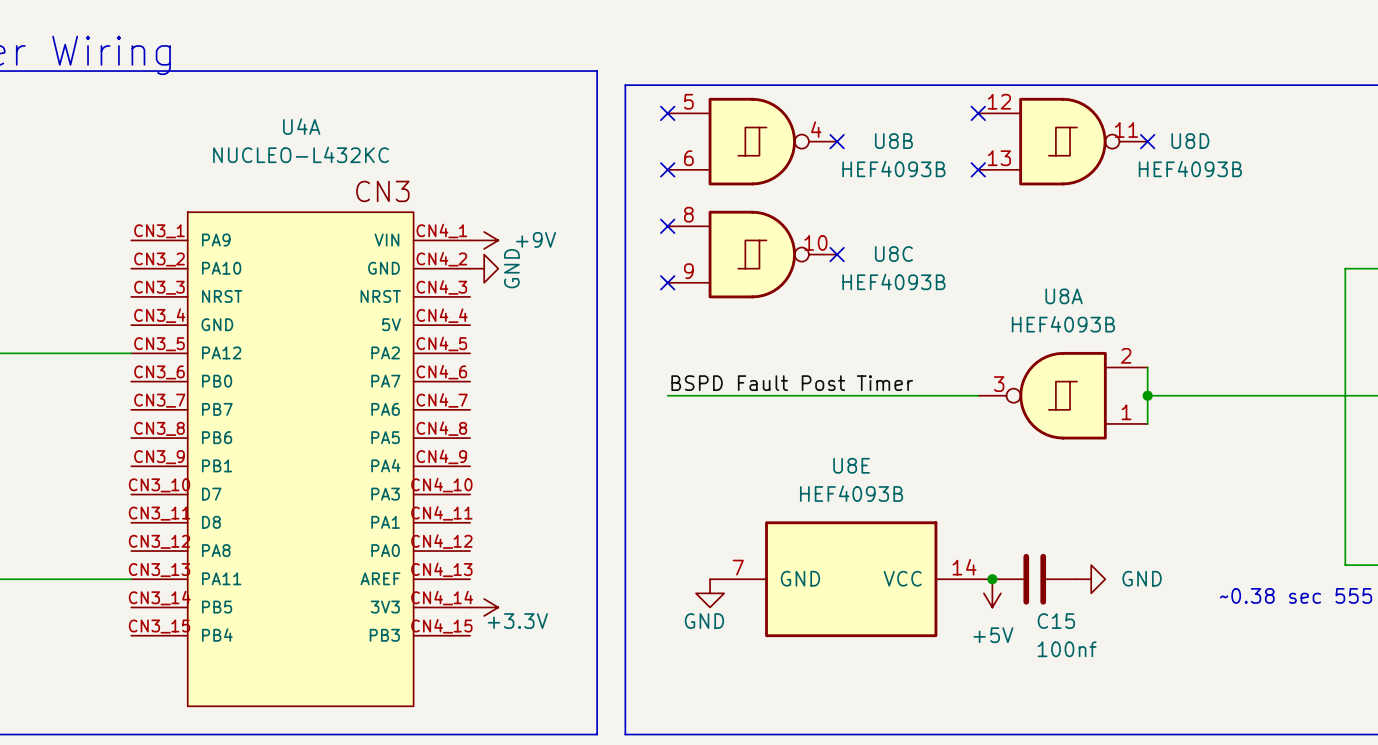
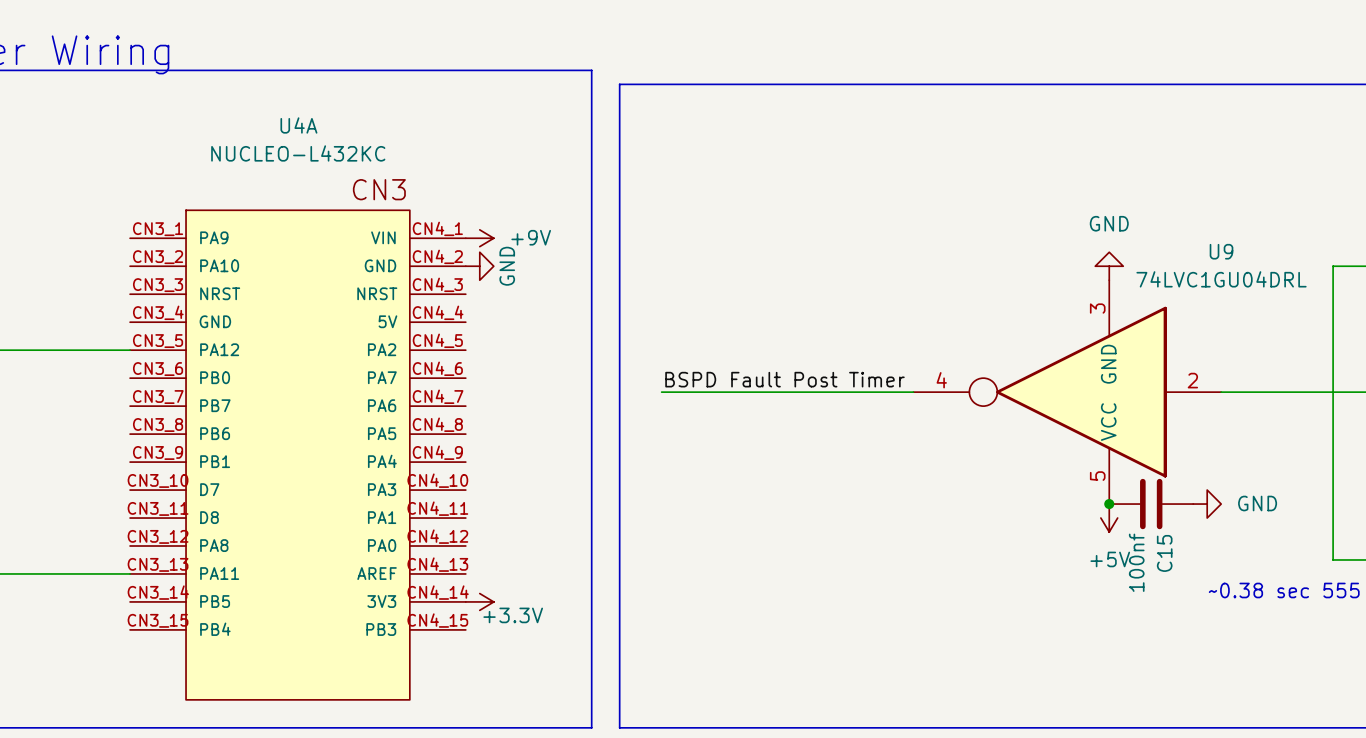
no-connect mark: (667, 113) -> none
no-connect mark: (978, 113) -> none
U8B: HEF4093B (752, 141) -> none
no-connect mark: (837, 141) -> none
U8D: HEF4093B (1062, 141) -> none
no-connect mark: (1147, 141) -> none
no-connect mark: (667, 169) -> none
no-connect mark: (978, 169) -> none
no-connect mark: (667, 226) -> none
U8C: HEF4093B (752, 254) -> none
no-connect mark: (837, 254) -> none
power symbol: none -> GND (1109, 266)
no-connect mark: (667, 282) -> none
U8A: HEF4093B (1062, 395) -> none
U9: none -> 74LVC1GU04DRL (1067, 392)
junction: (1147, 395) -> none
junction: none -> (1109, 504)
U8E: HEF4093B (851, 579) -> none
junction: (992, 579) -> none
C15 position: (1034, 579) -> (1151, 504)
power symbol position: GND (1091, 579) -> GND (1207, 504)
power symbol: GND (710, 593) -> none
power symbol position: +5V (992, 593) -> +5V (1109, 518)
C15 name rotation: 0° (1056, 621) -> 90° counterclockwise (1164, 553)
C15 value rotation: 0° (1067, 649) -> 90° counterclockwise (1136, 562)

